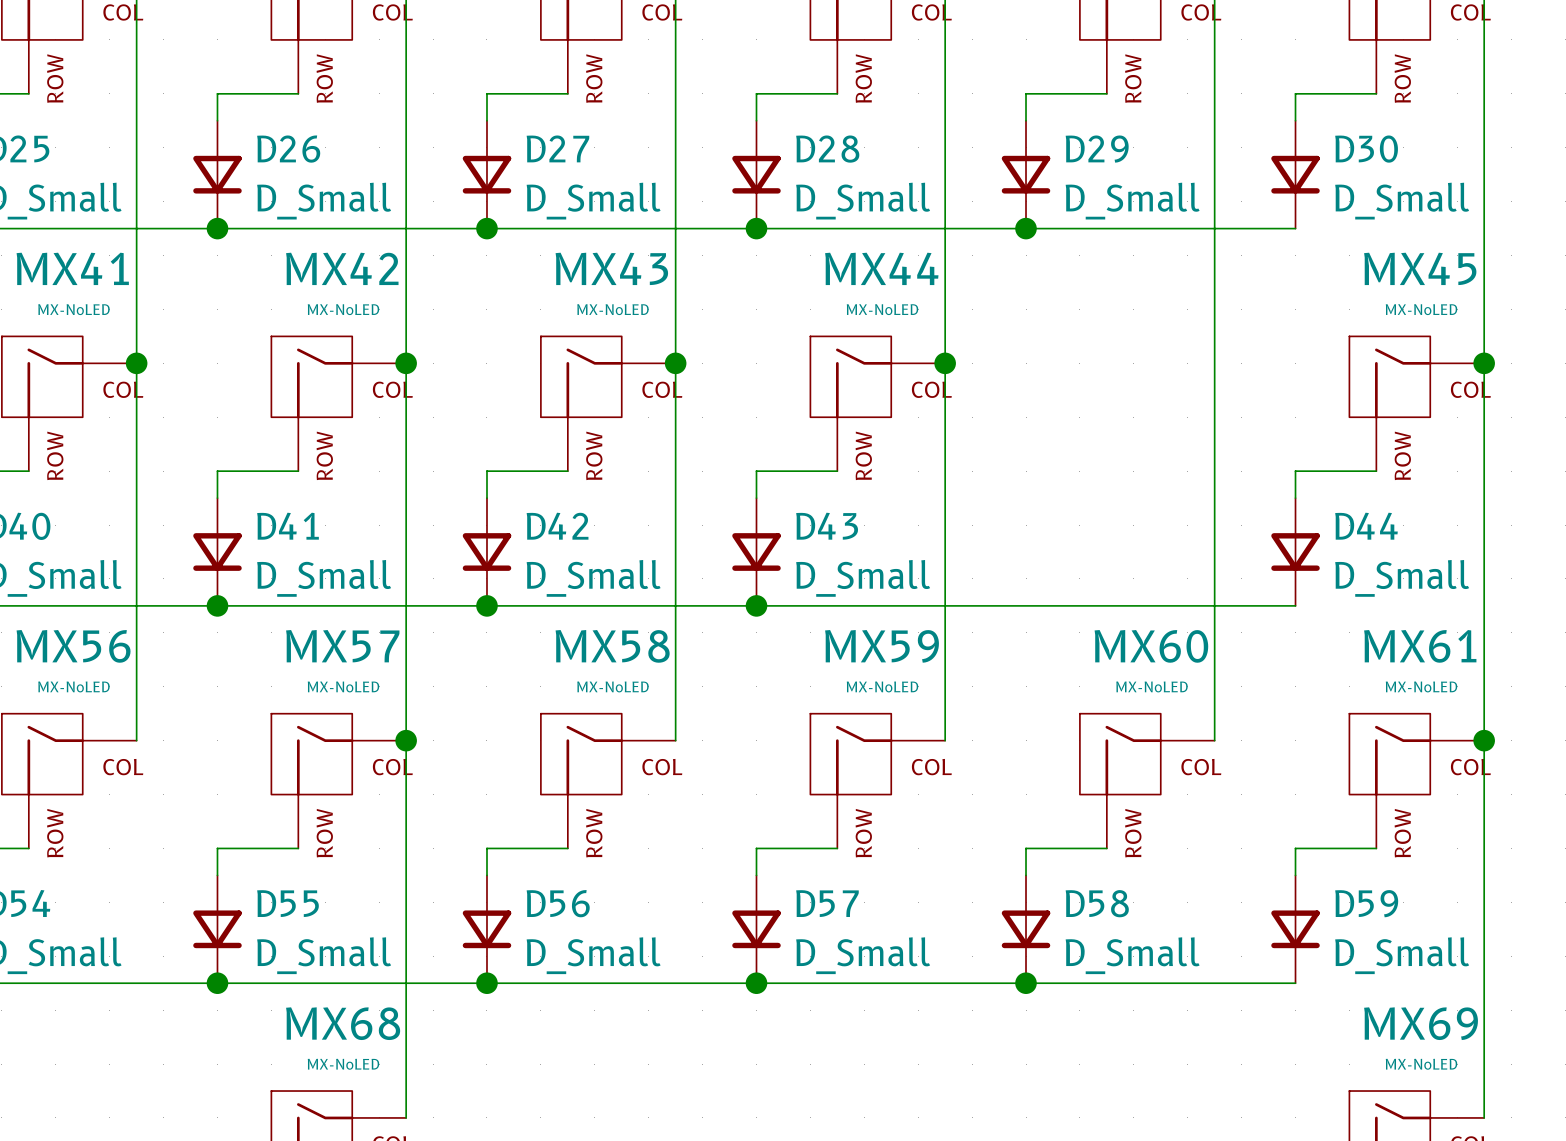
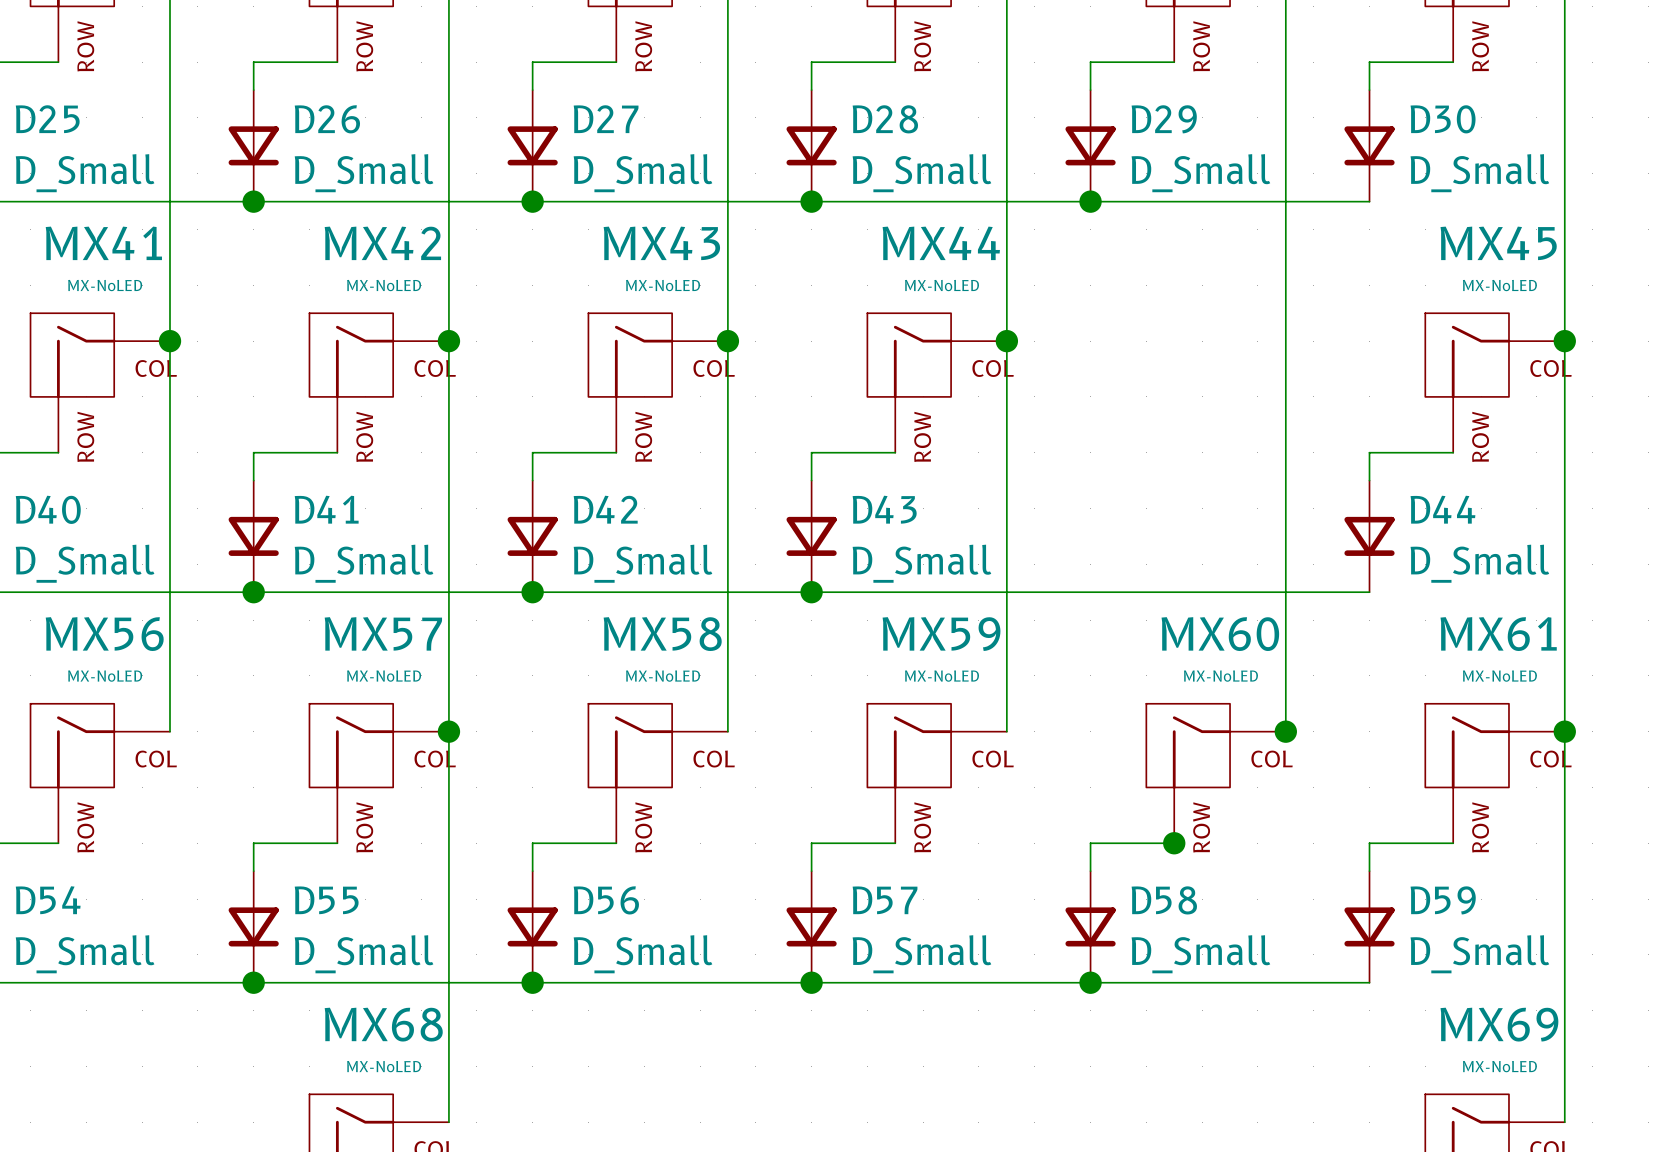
junction: none -> (1285, 731)
junction: none -> (1174, 843)

